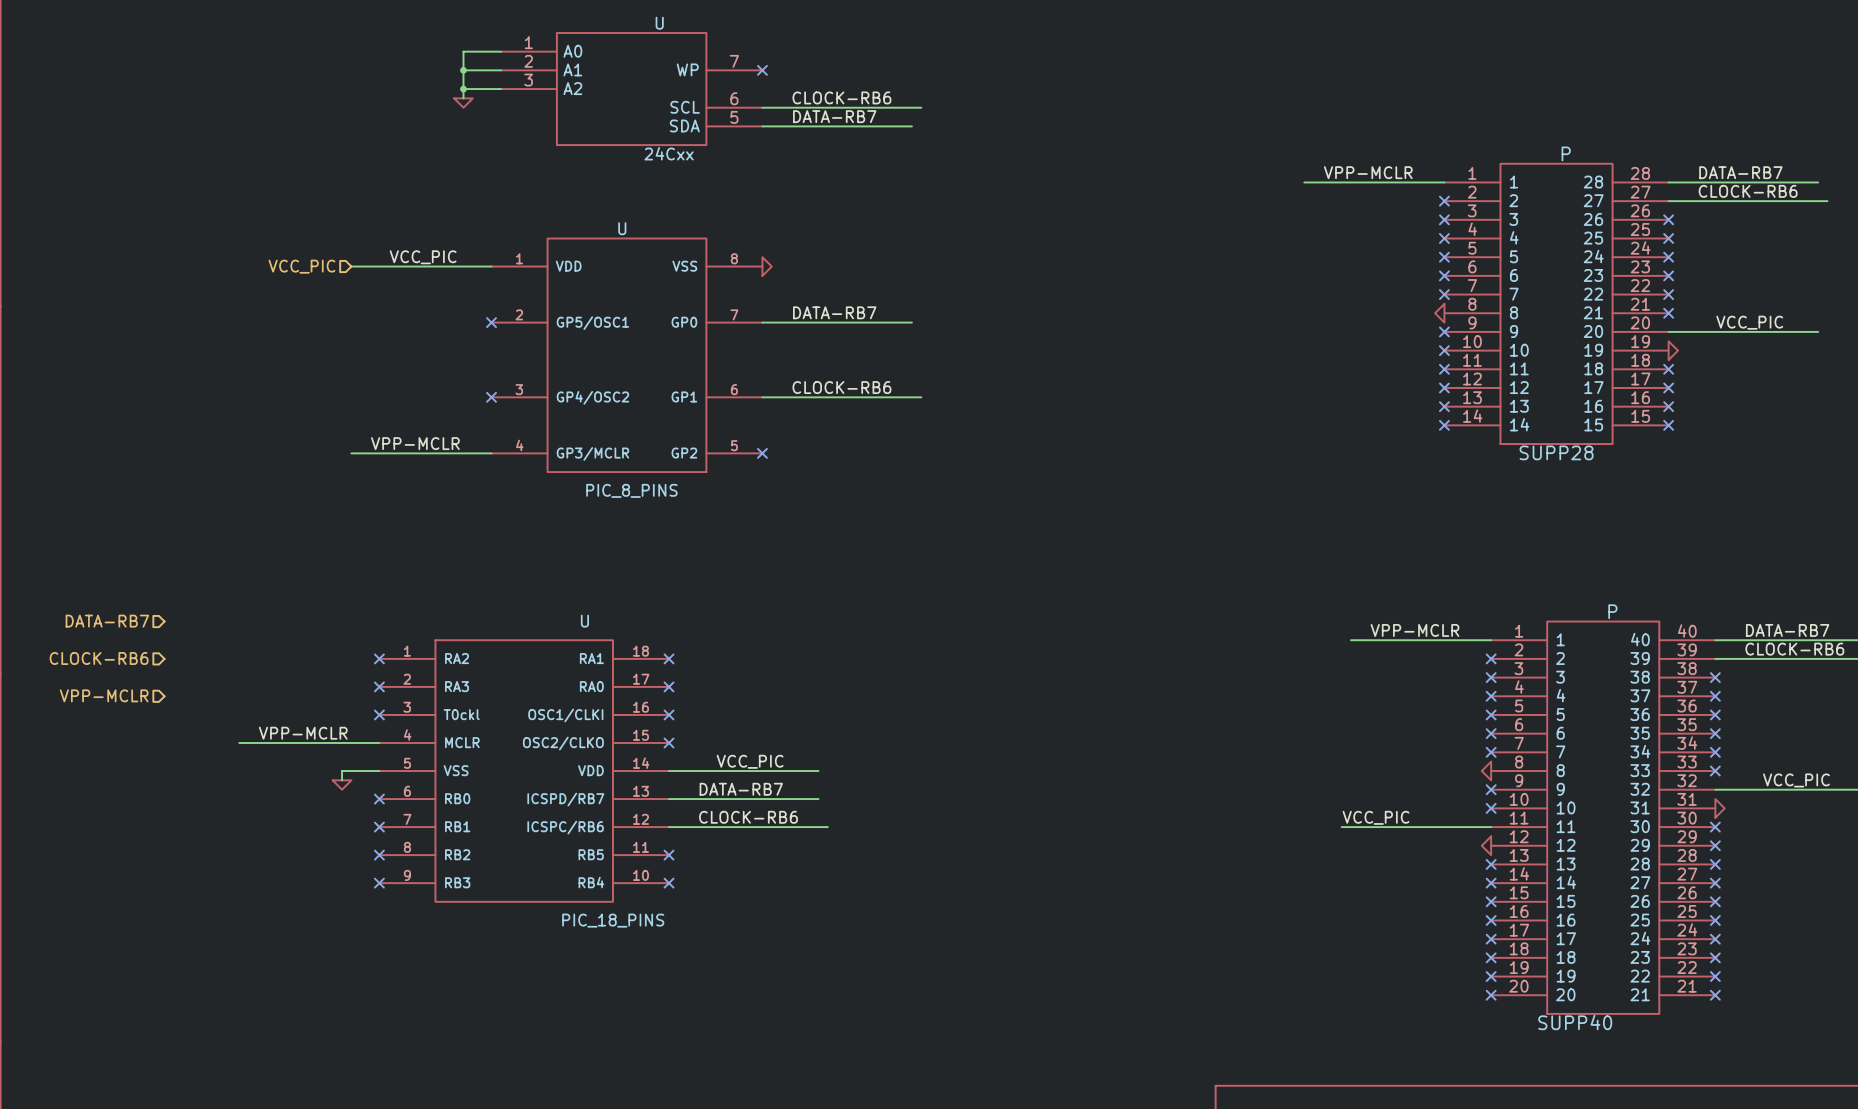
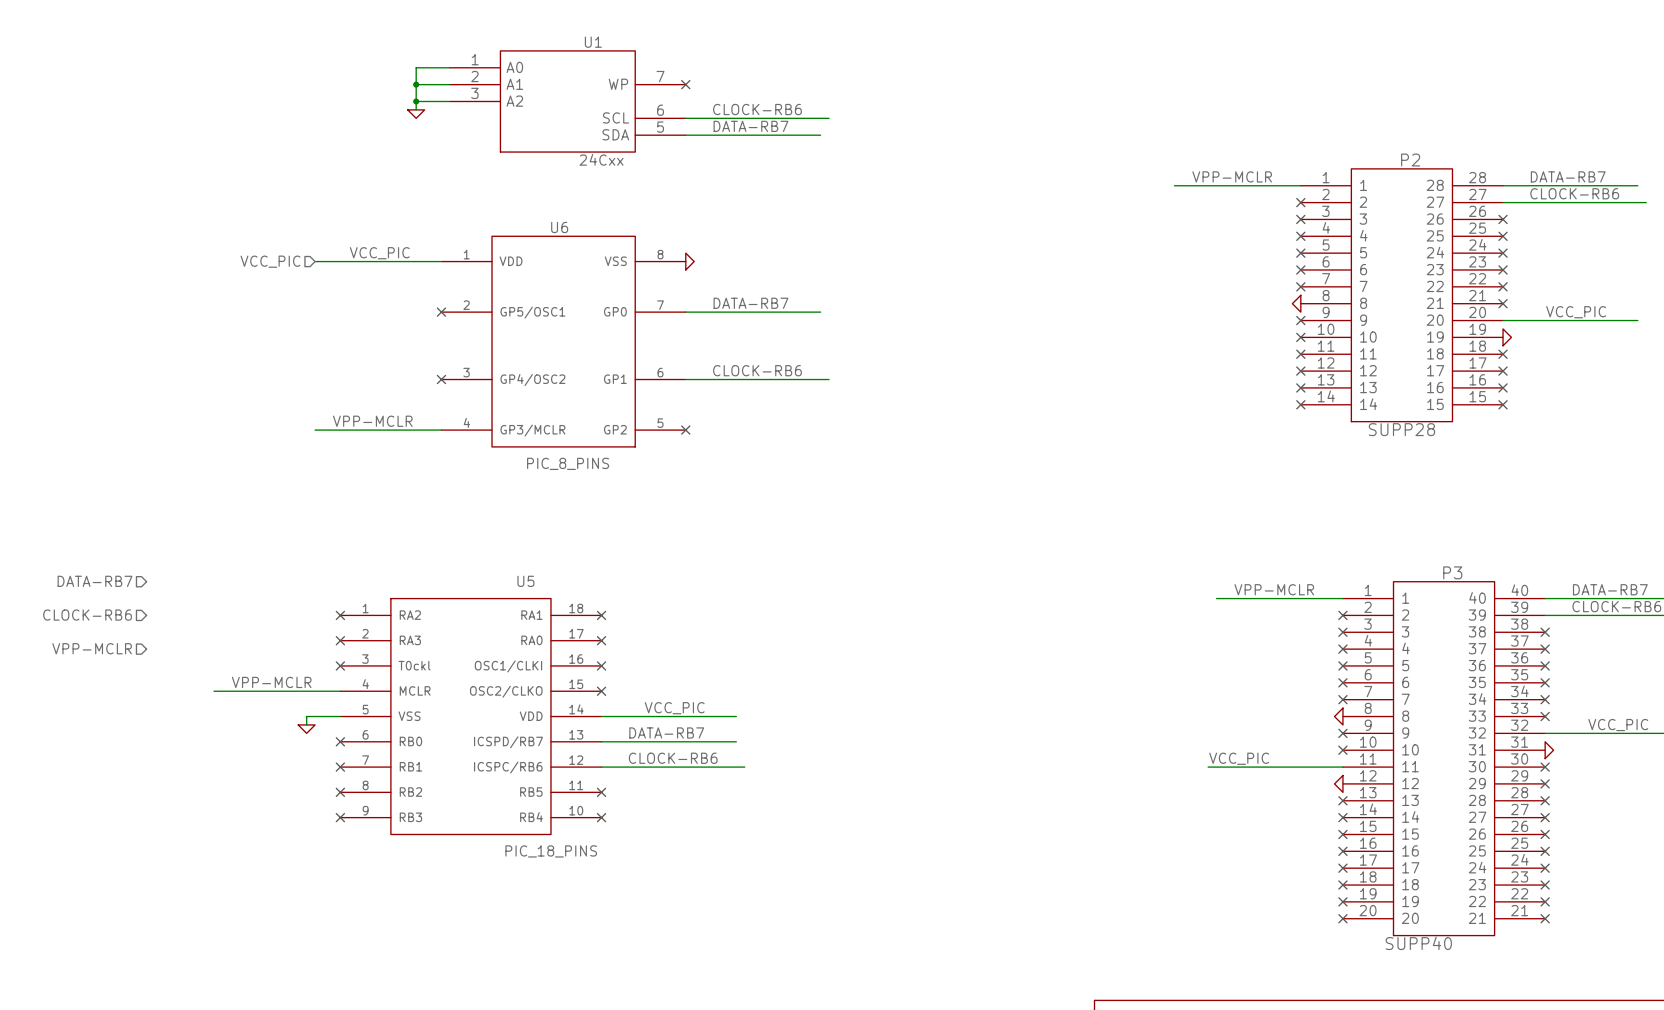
U name: U (659, 23) -> U1 (593, 42)
P name: P (1566, 153) -> P2 (1410, 160)
U name: U (622, 228) -> U6 (559, 227)
P name: P (1612, 611) -> P3 (1452, 572)
U name: U (584, 621) -> U5 (525, 581)

